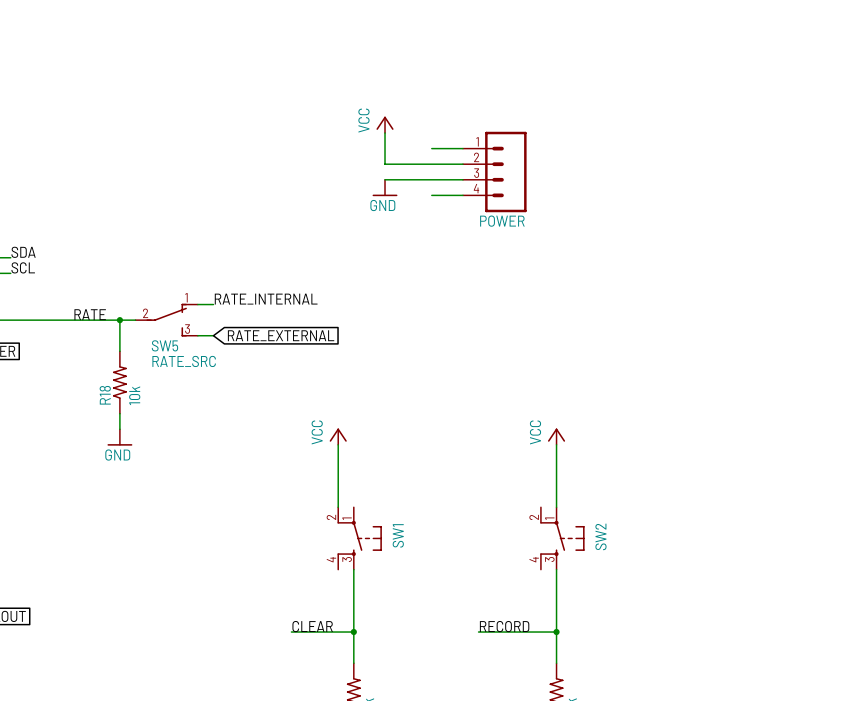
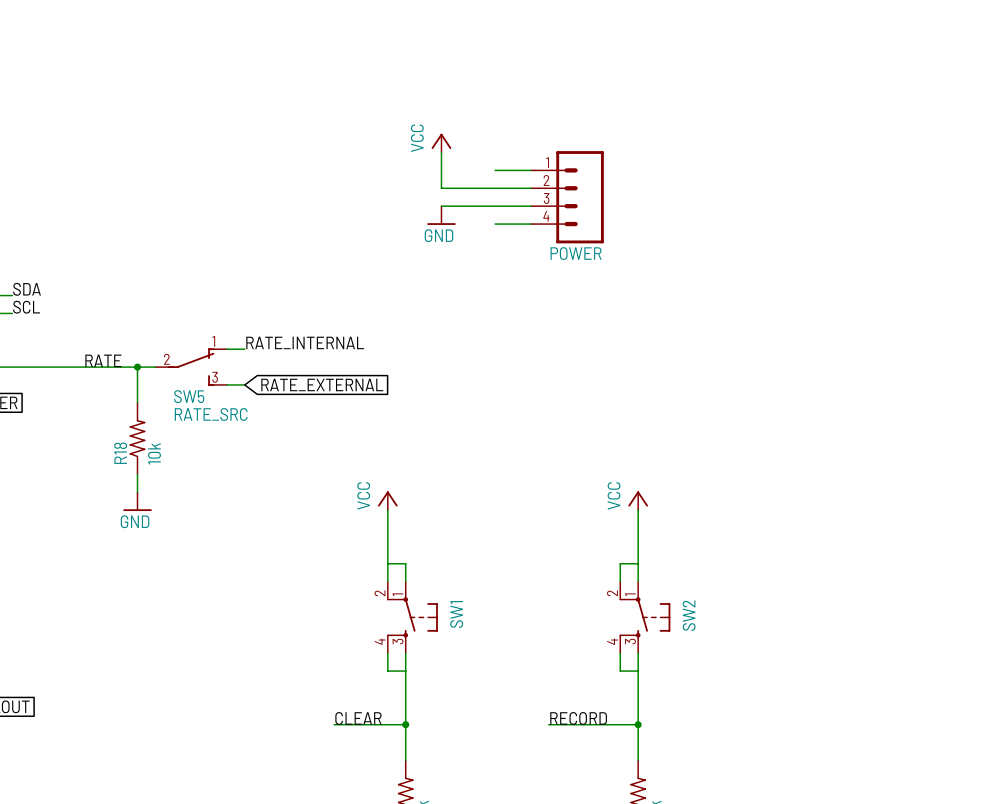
wire: none -> (387, 563) (405, 563) (405, 581)
wire: none -> (638, 563) (620, 563) (620, 581)
wire: none -> (387, 653) (387, 671) (405, 671)
wire: none -> (620, 653) (620, 671) (638, 671)

